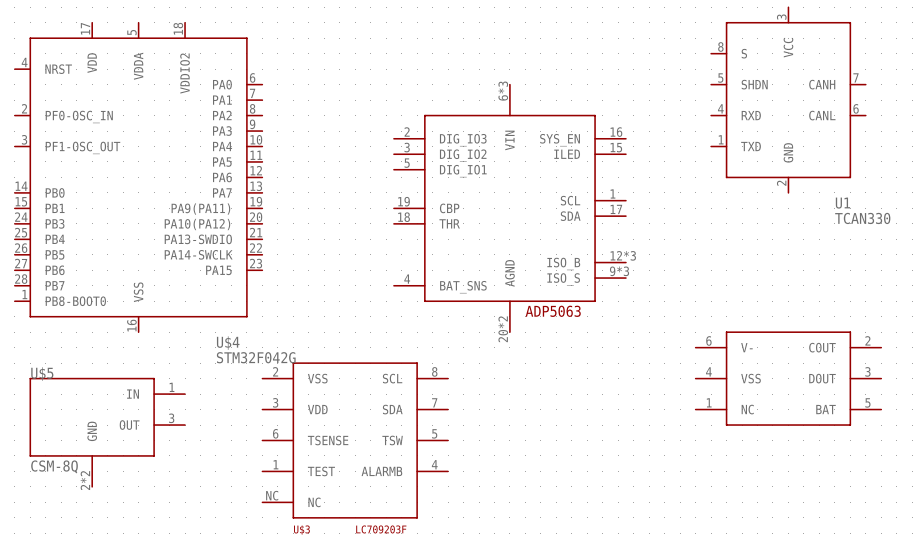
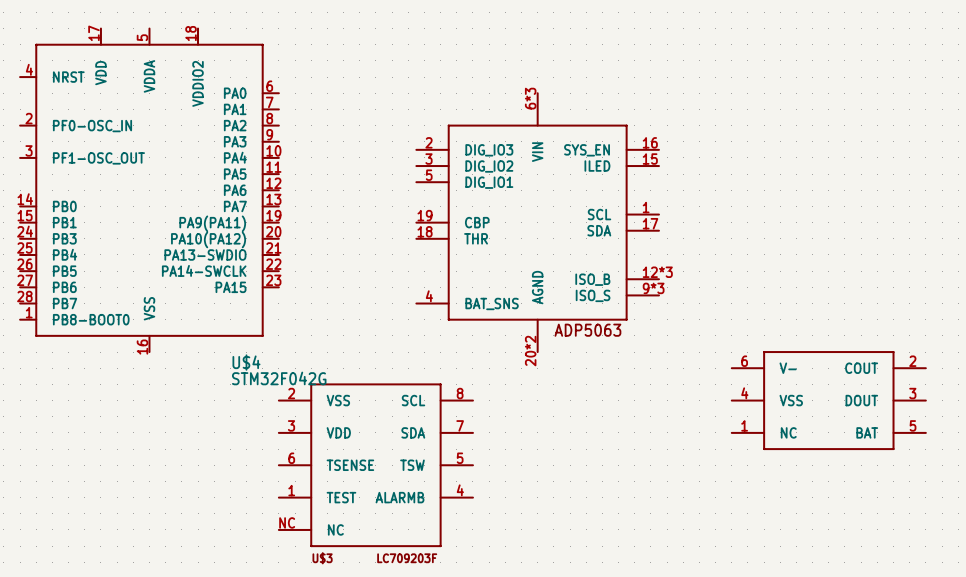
U1: TCAN330 (788, 100) -> none
U$5: CSM-8Q (107, 432) -> none

